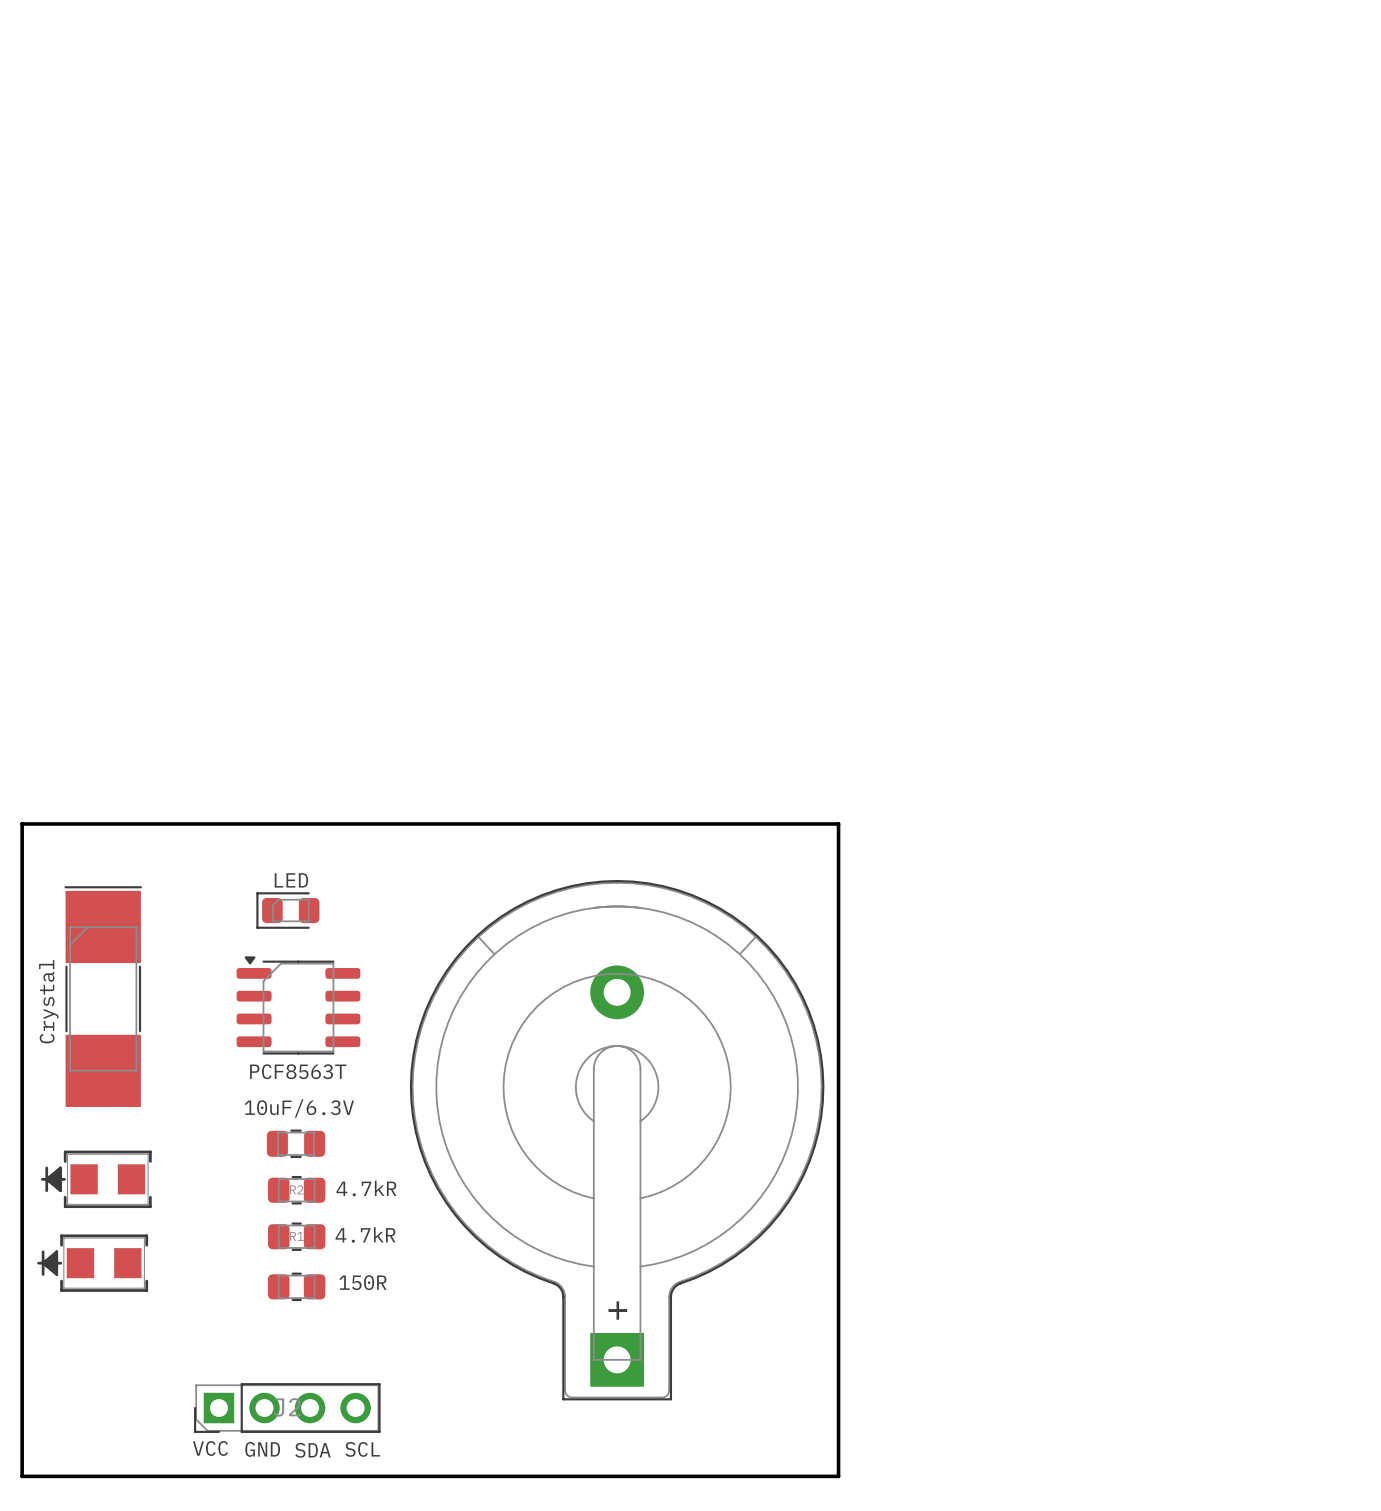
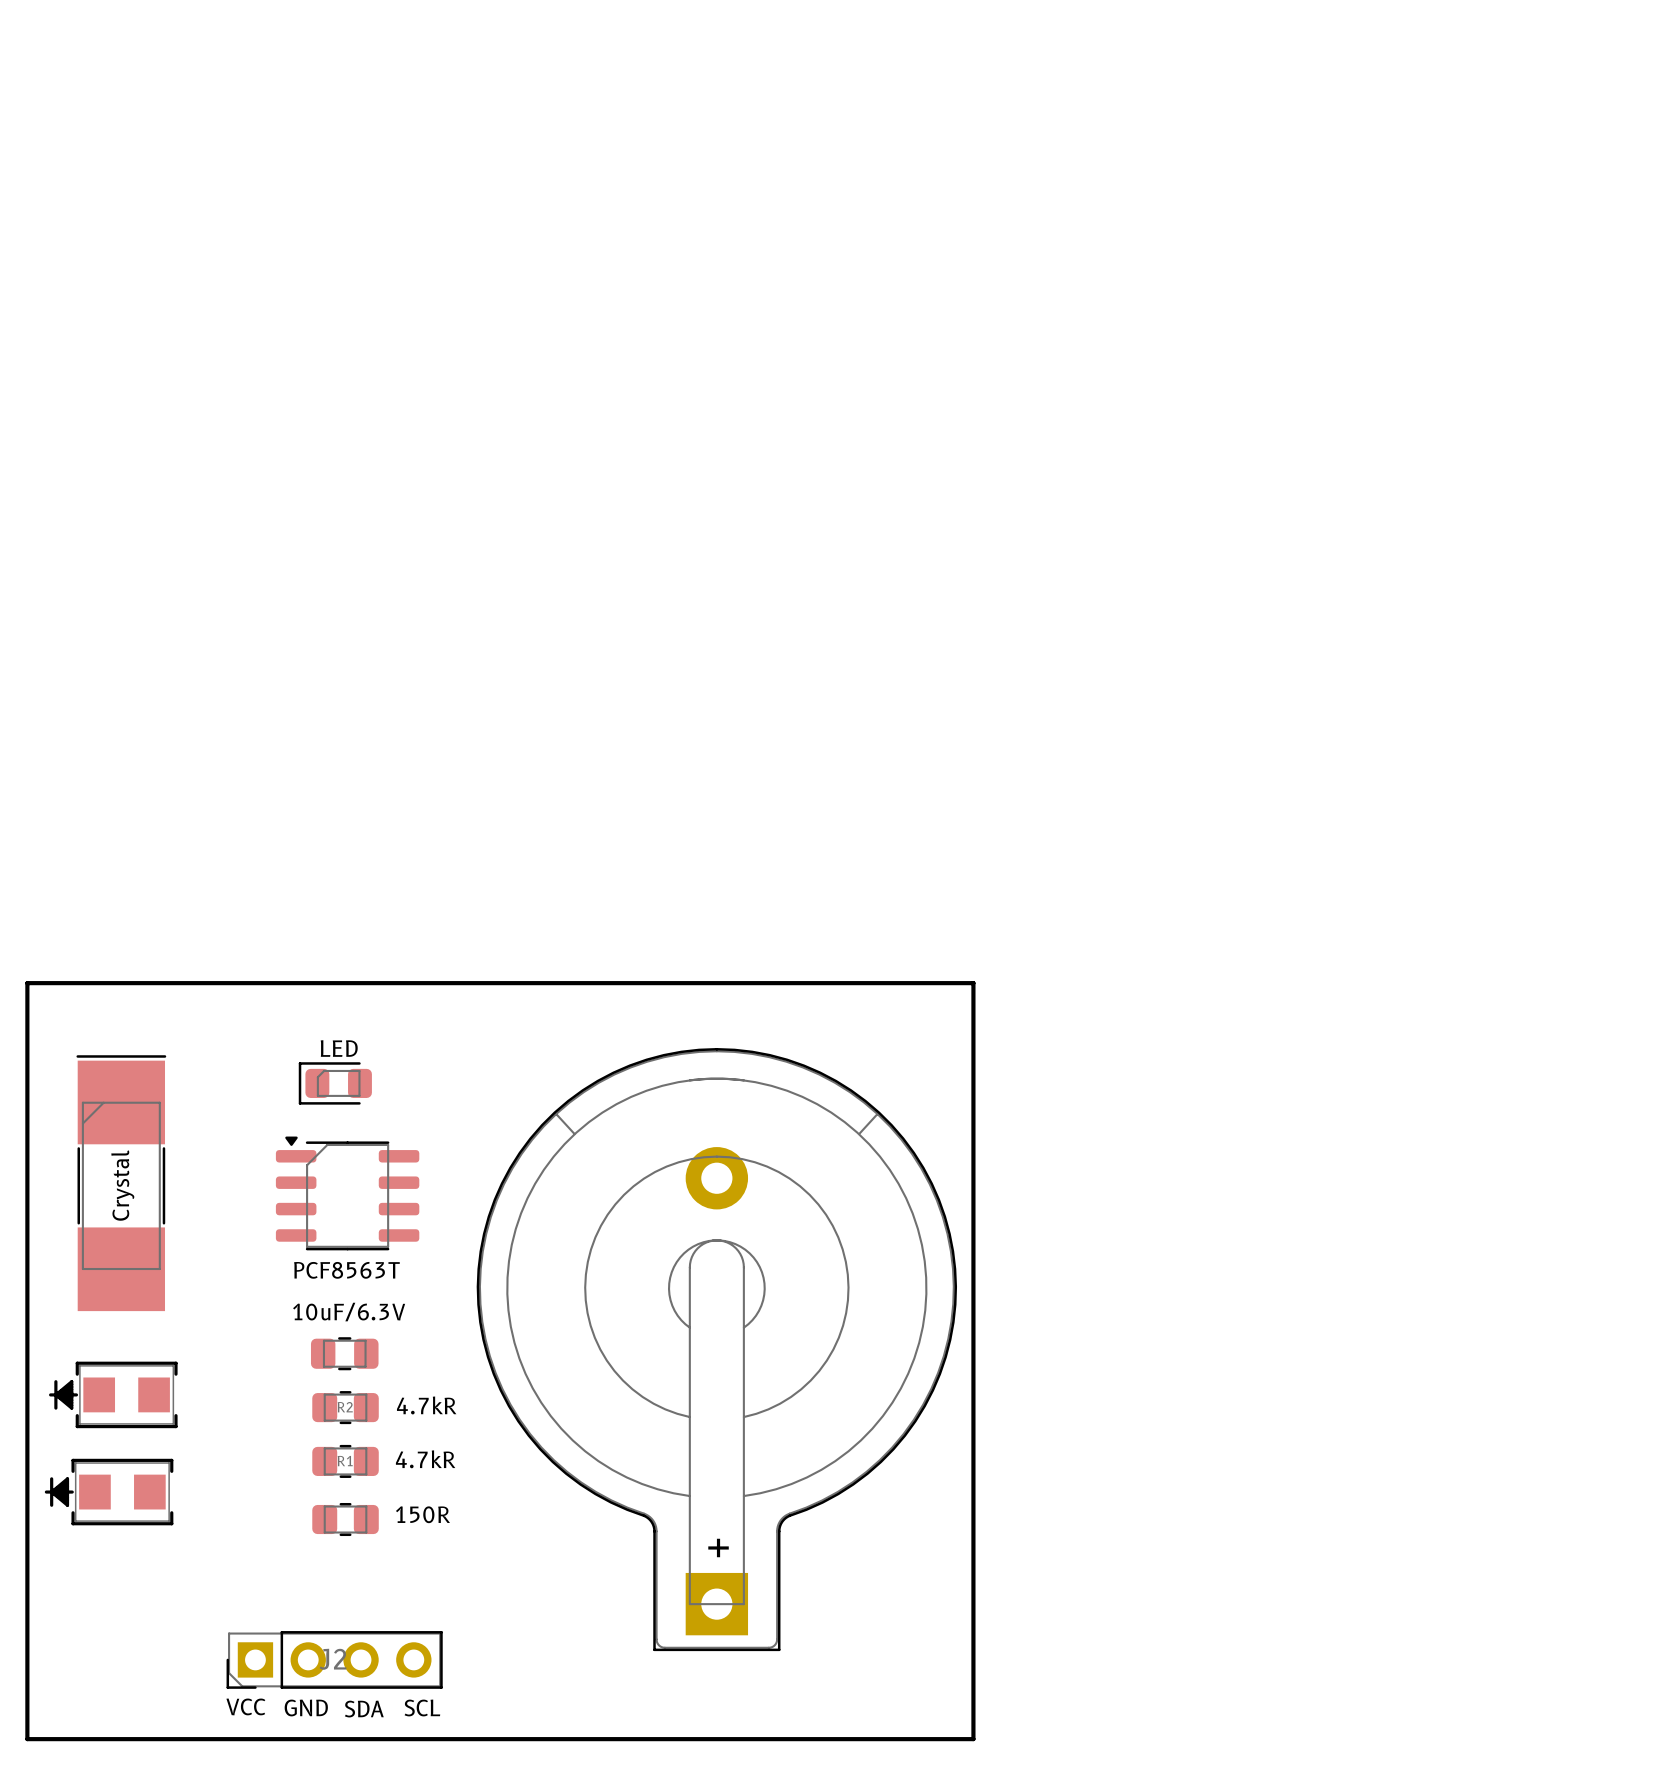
Crystal name position: Crystal (48, 1001) -> Crystal (122, 1185)

